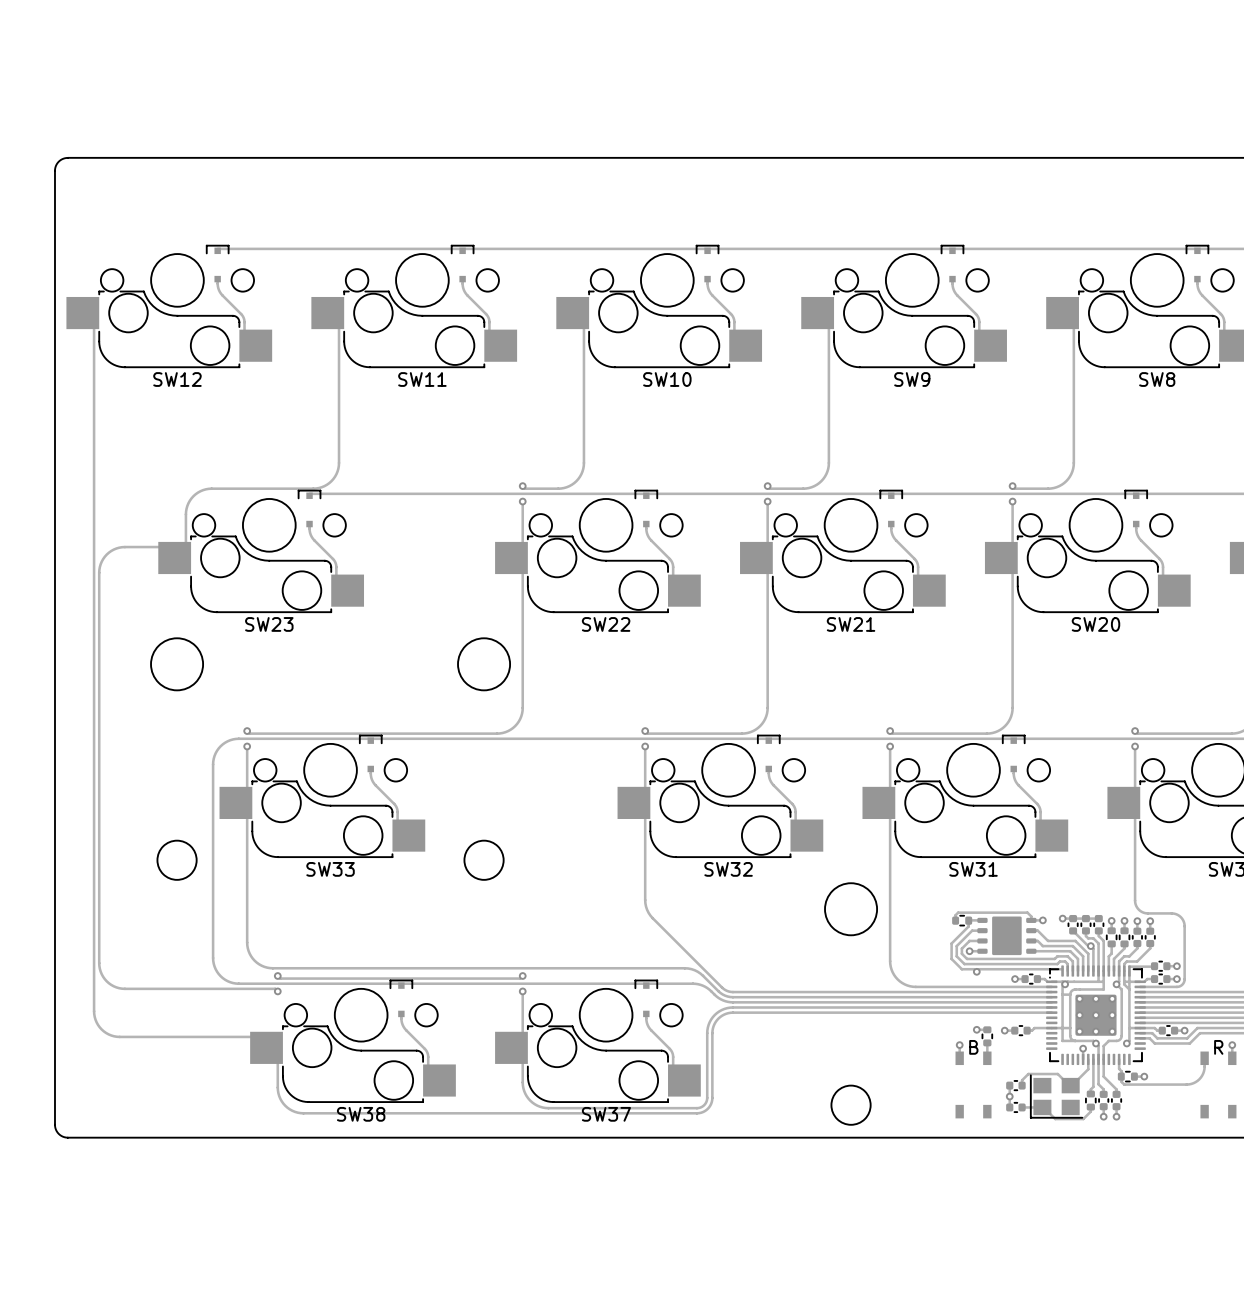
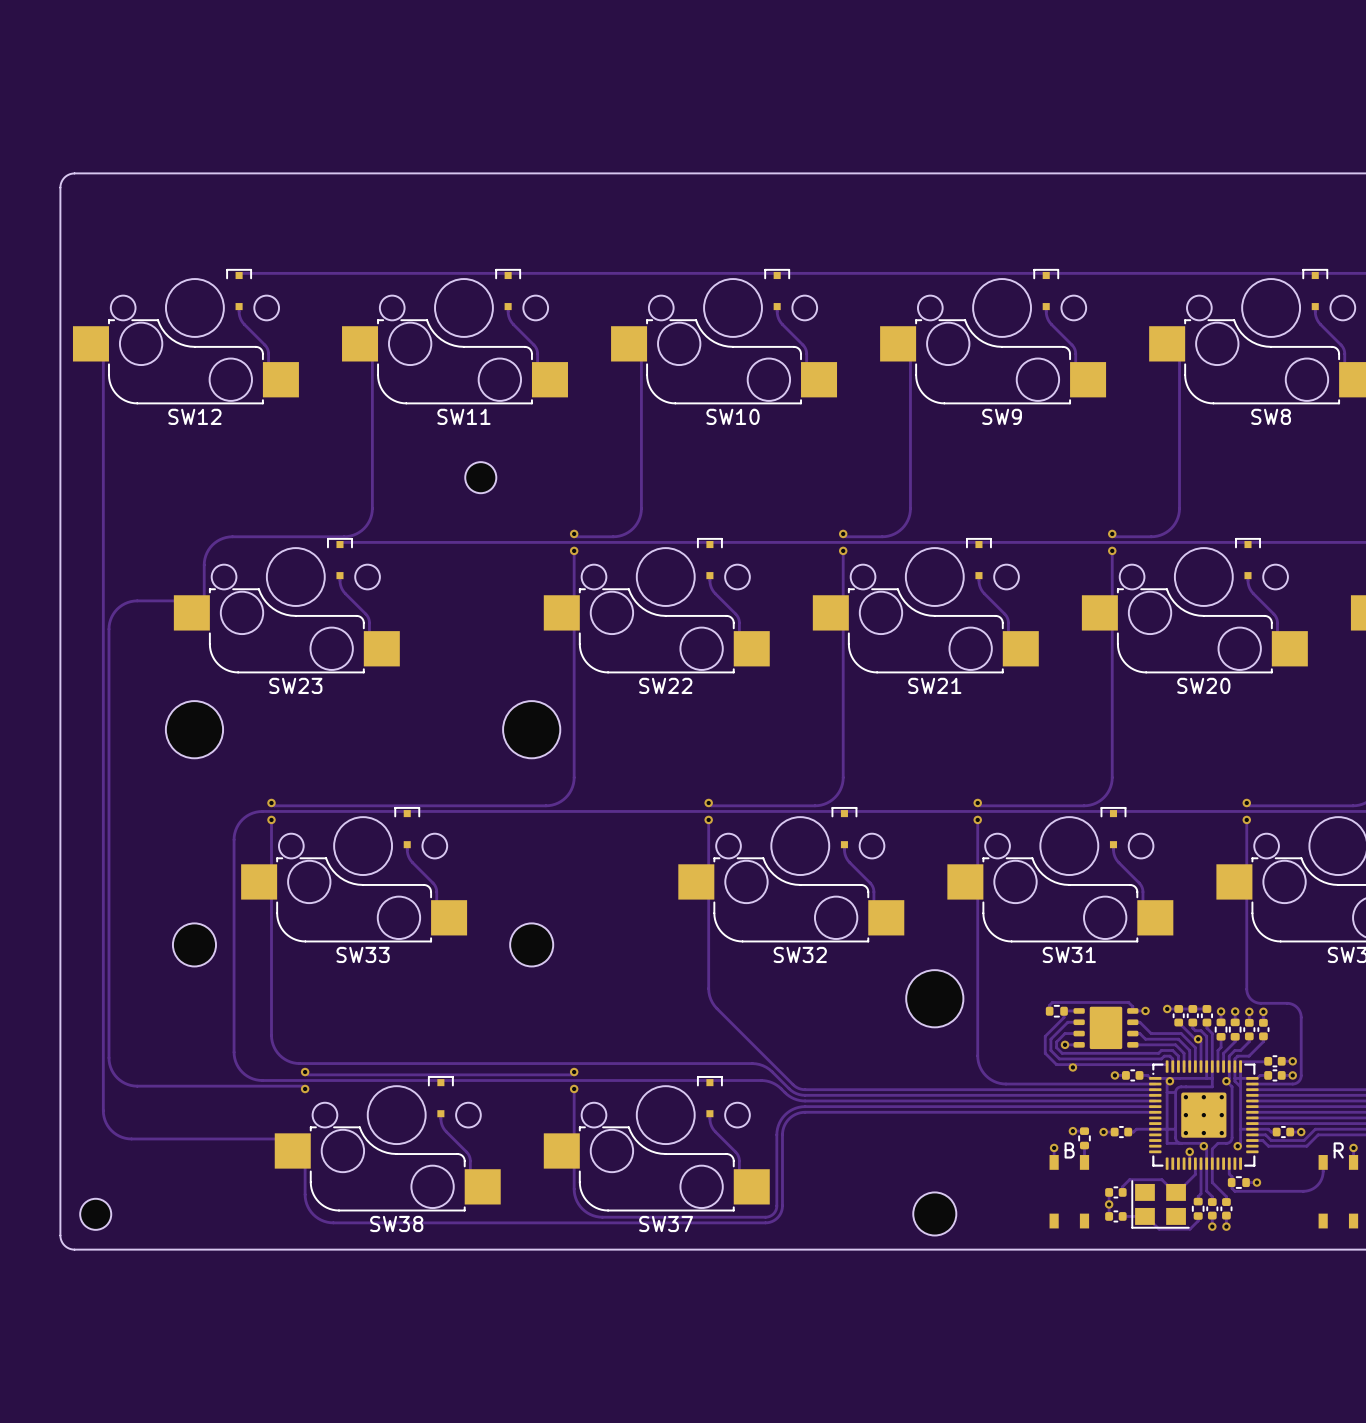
part: none -> (480, 477)
part: none -> (95, 1214)

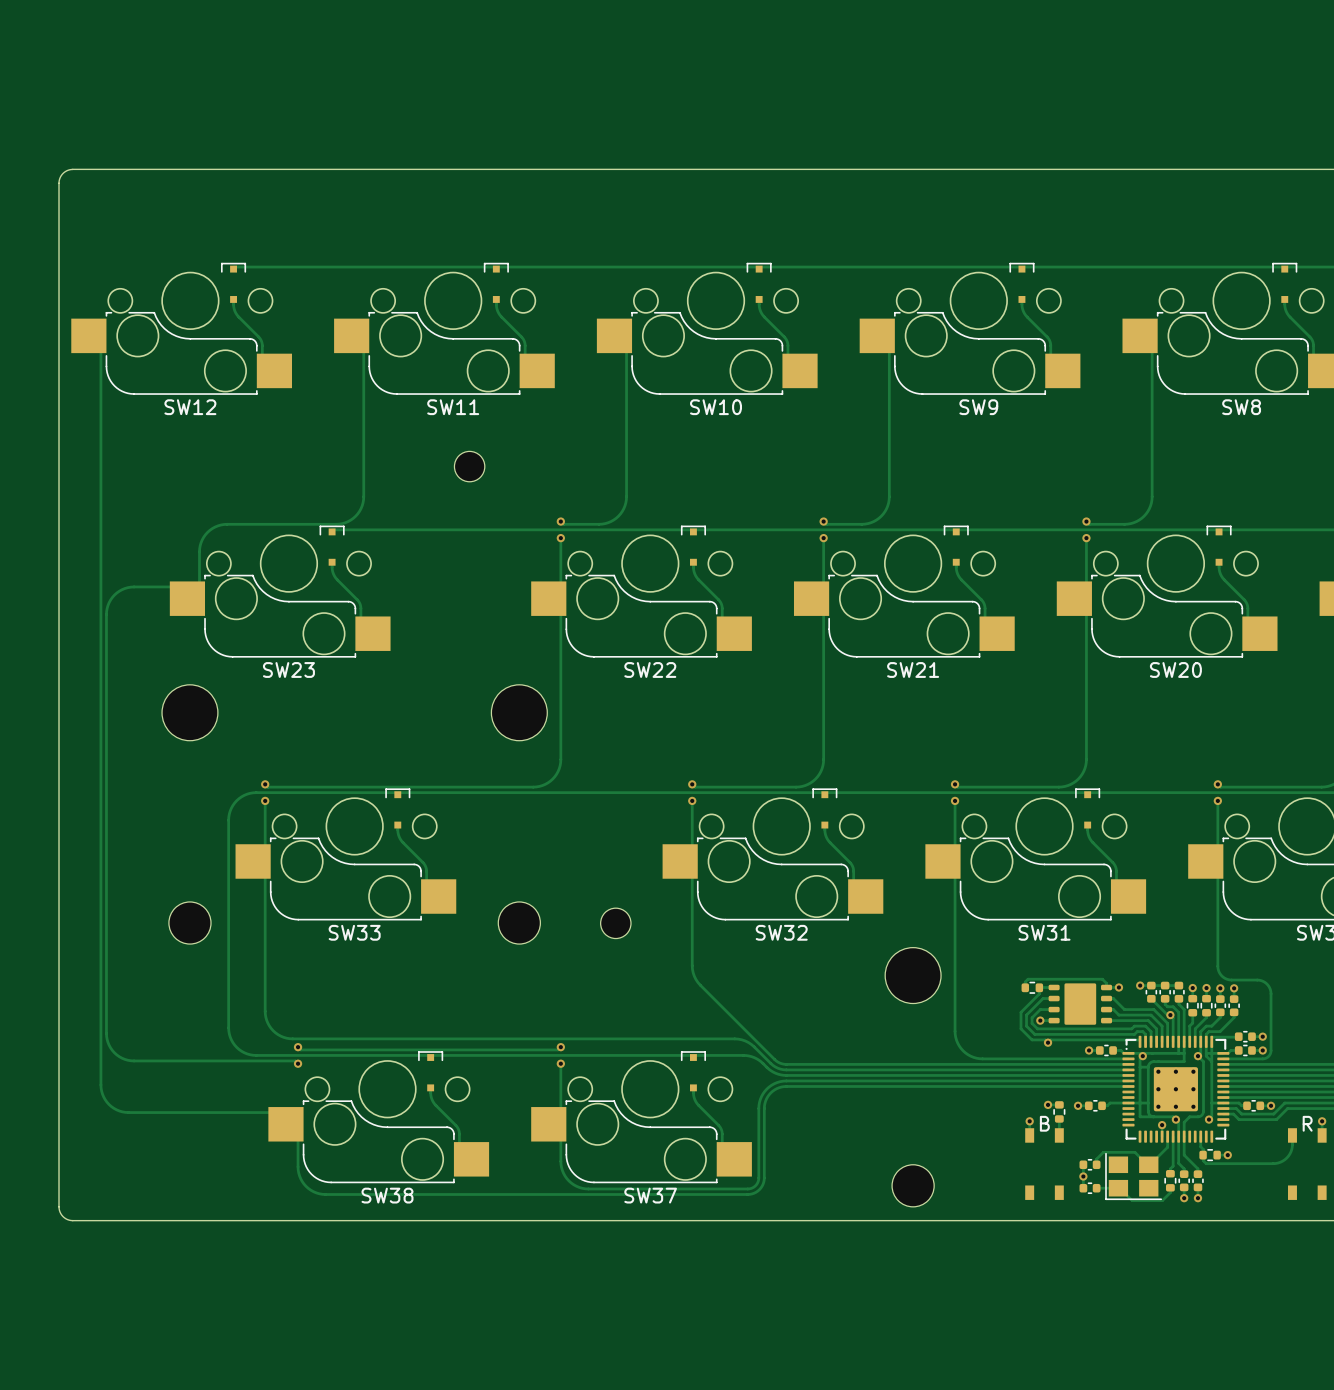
part: none -> (615, 923)
part: (95, 1214) -> none

